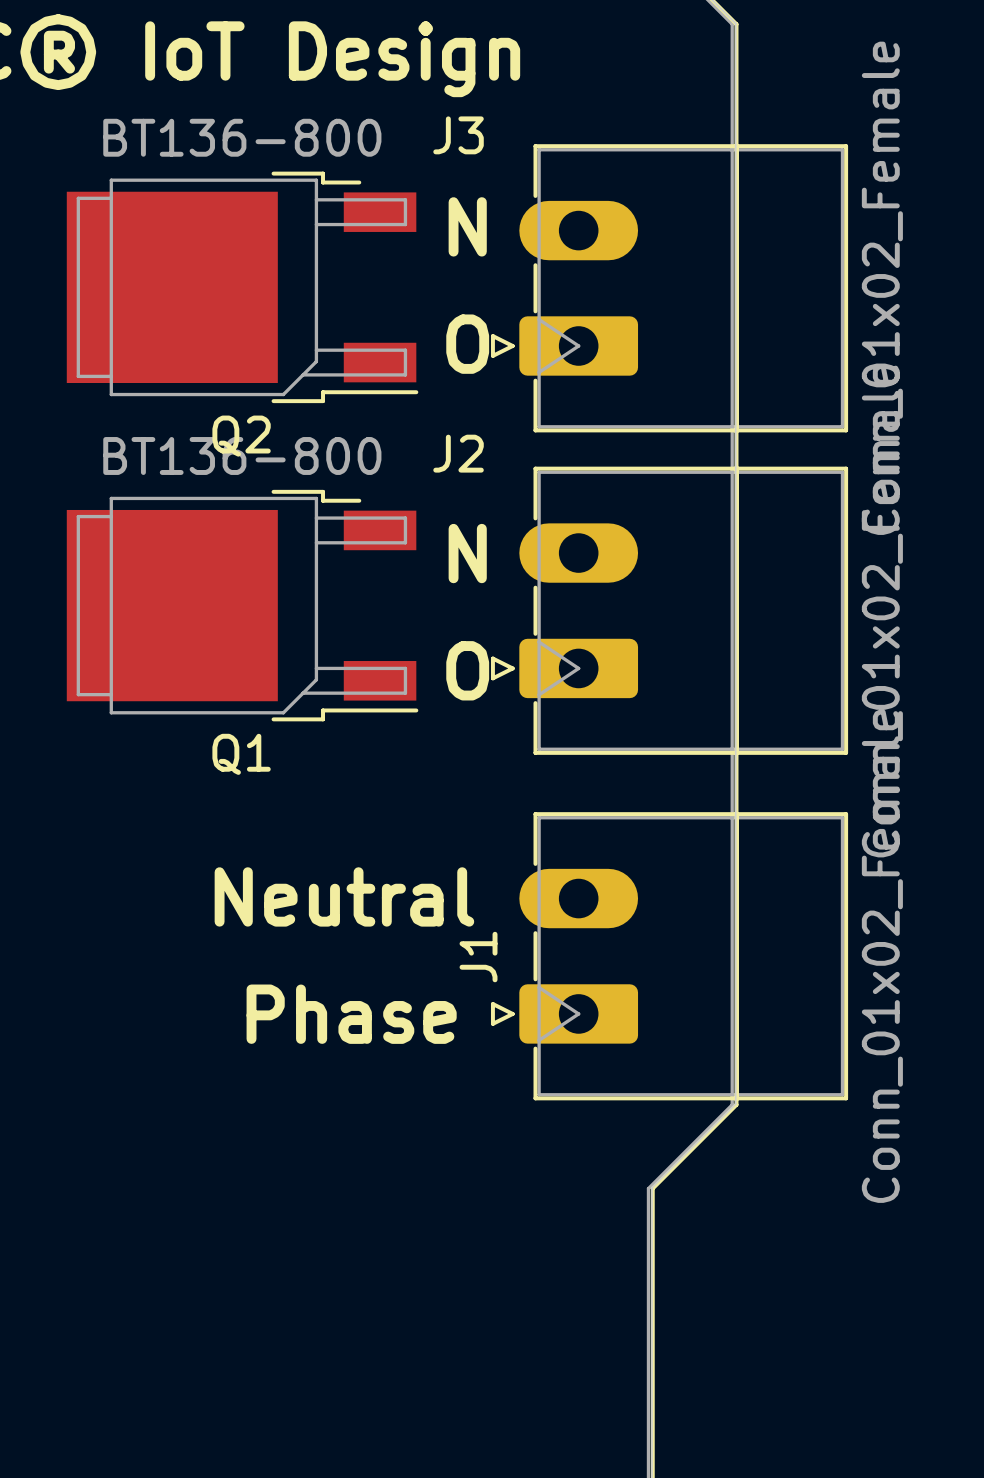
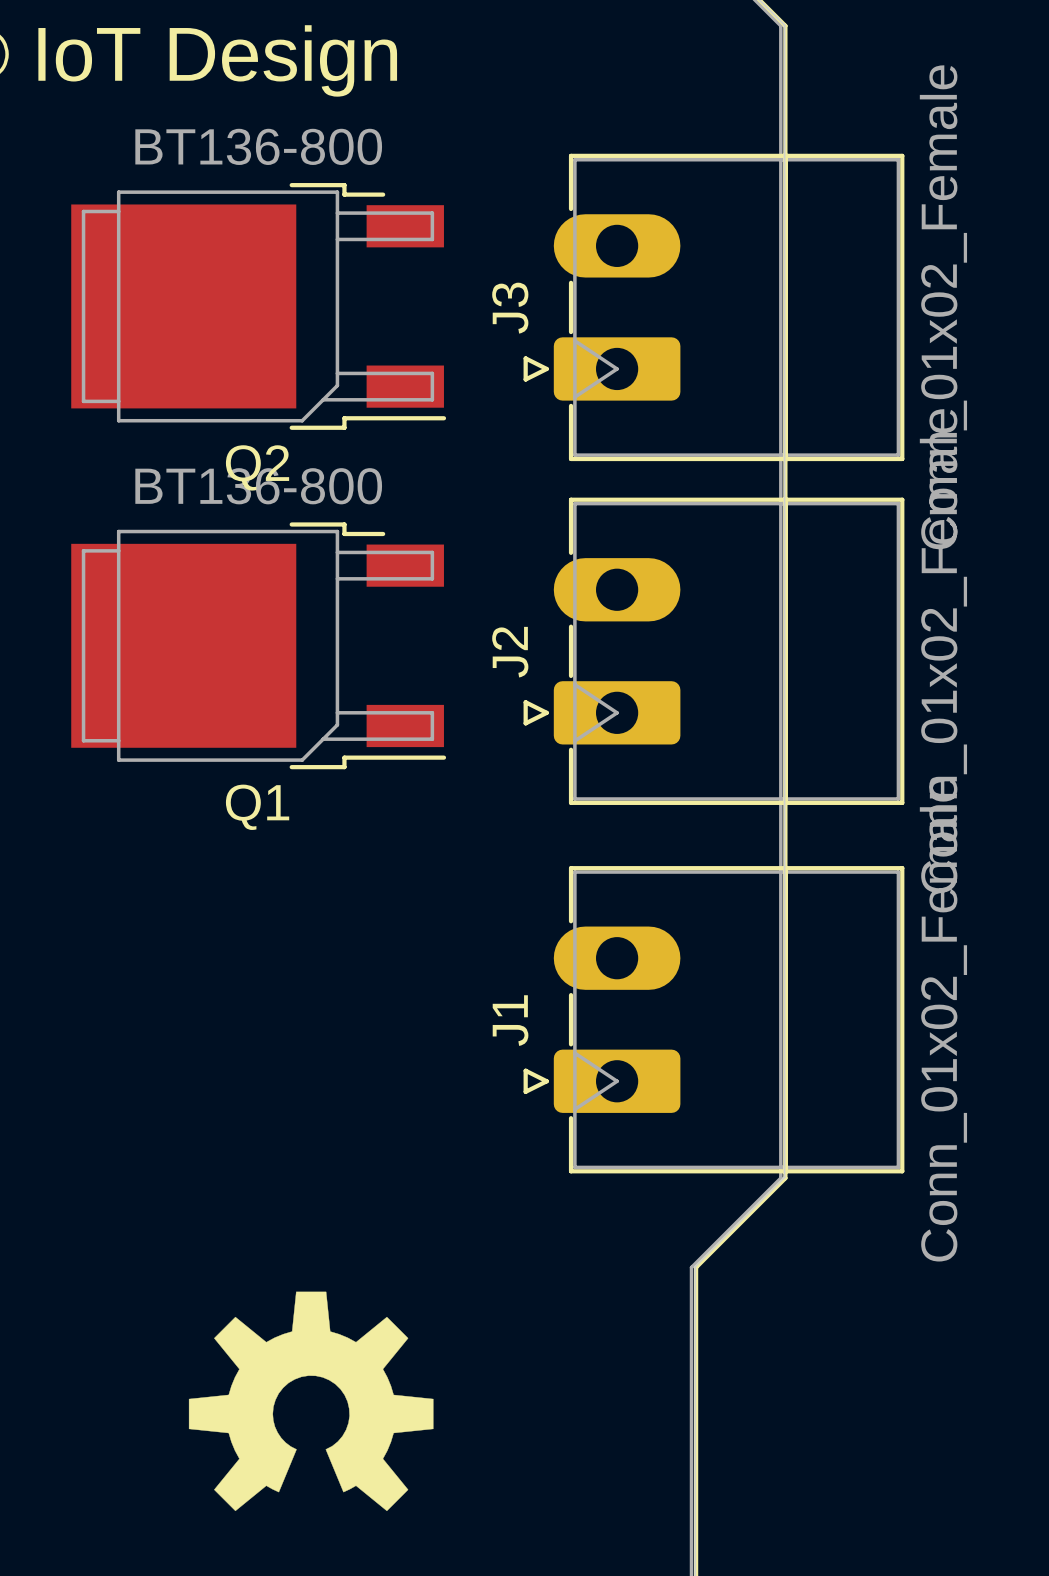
J3 name rotation: 0° (458, 135) -> 90° counterclockwise (510, 308)
J3 name position: J3 (458, 135) -> J3 (510, 308)
text: N (467, 226) -> none
text: O (467, 344) -> none
J2 name rotation: 0° (458, 453) -> 90° counterclockwise (510, 652)
J2 name position: J2 (458, 453) -> J2 (510, 652)
text: N (467, 553) -> none
text: O (467, 670) -> none
text: Neutral (344, 896) -> none
text: Phase (351, 1014) -> none
drawing: none -> [188, 1291, 434, 1512]

